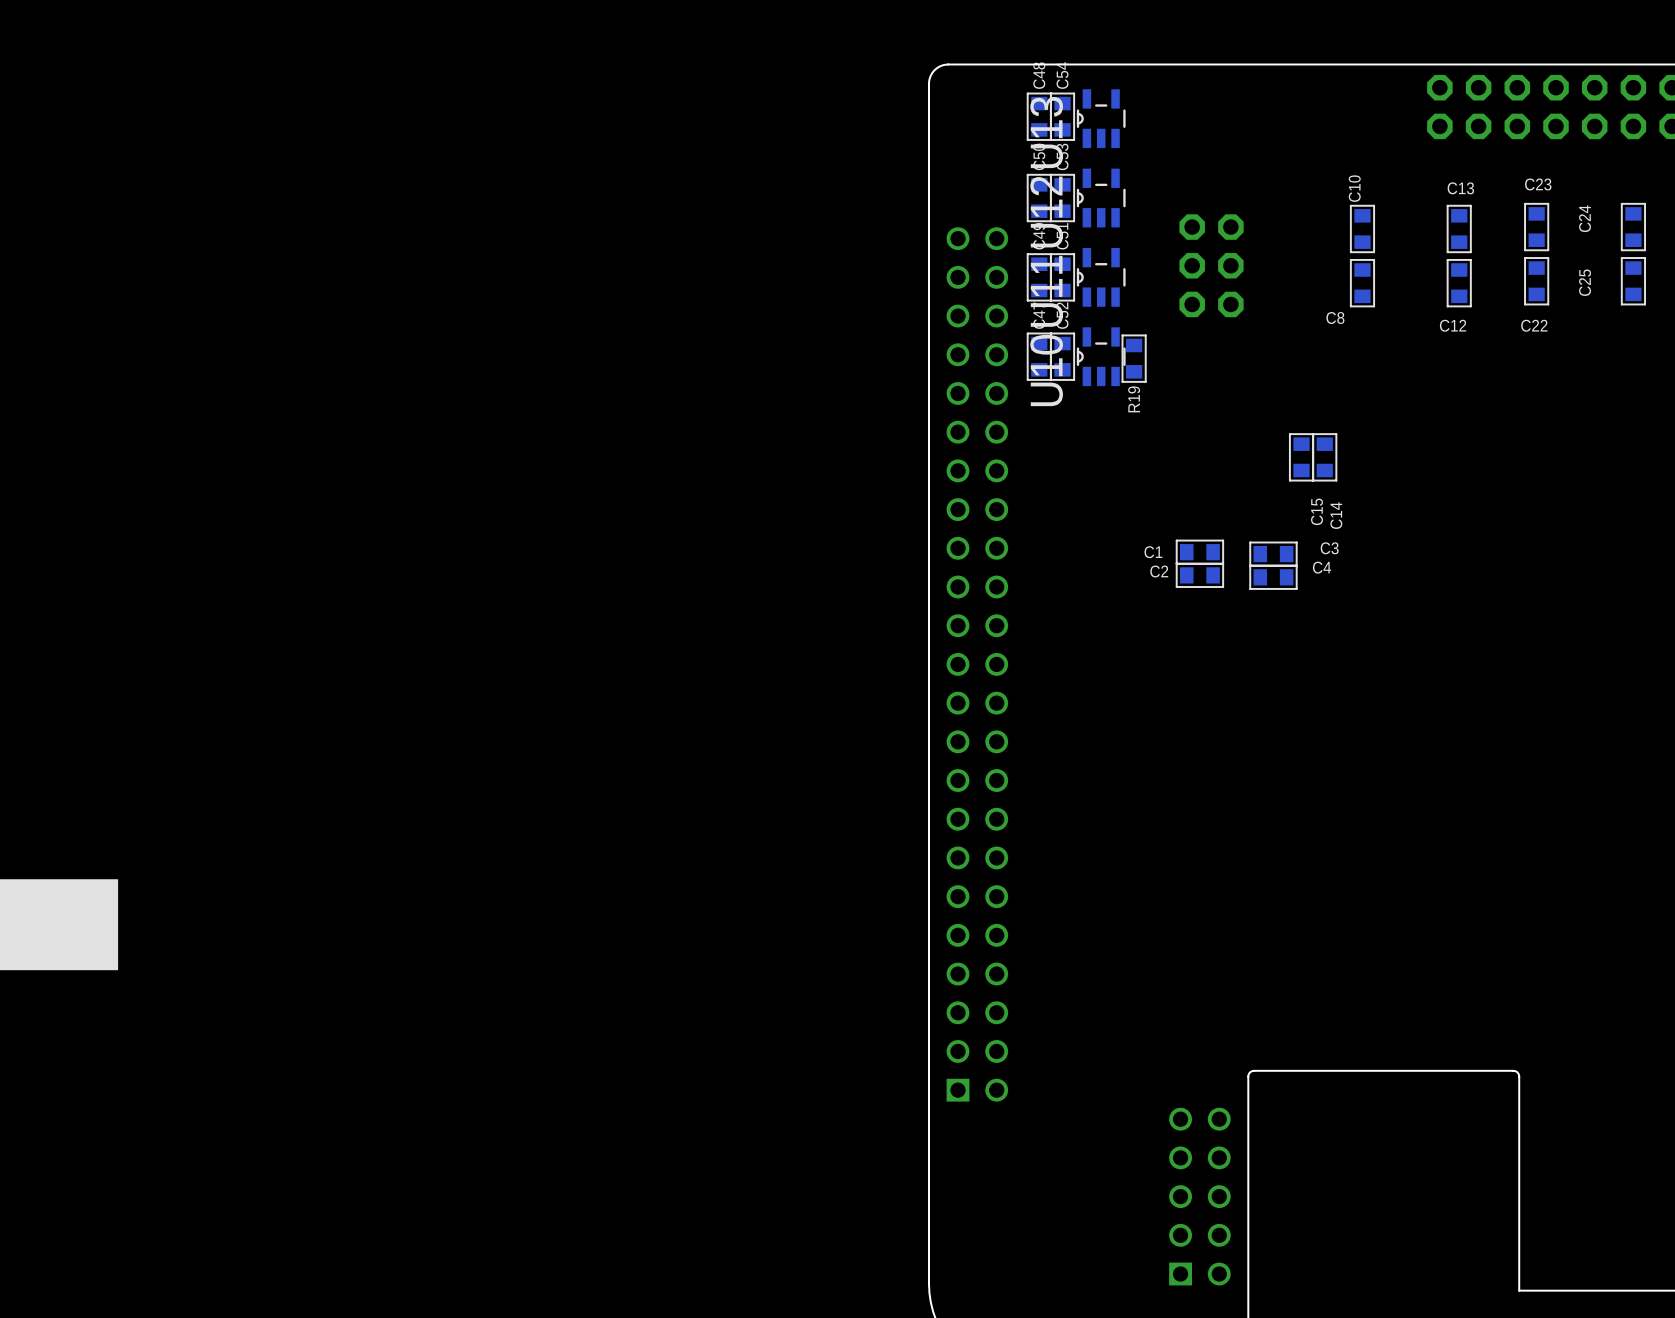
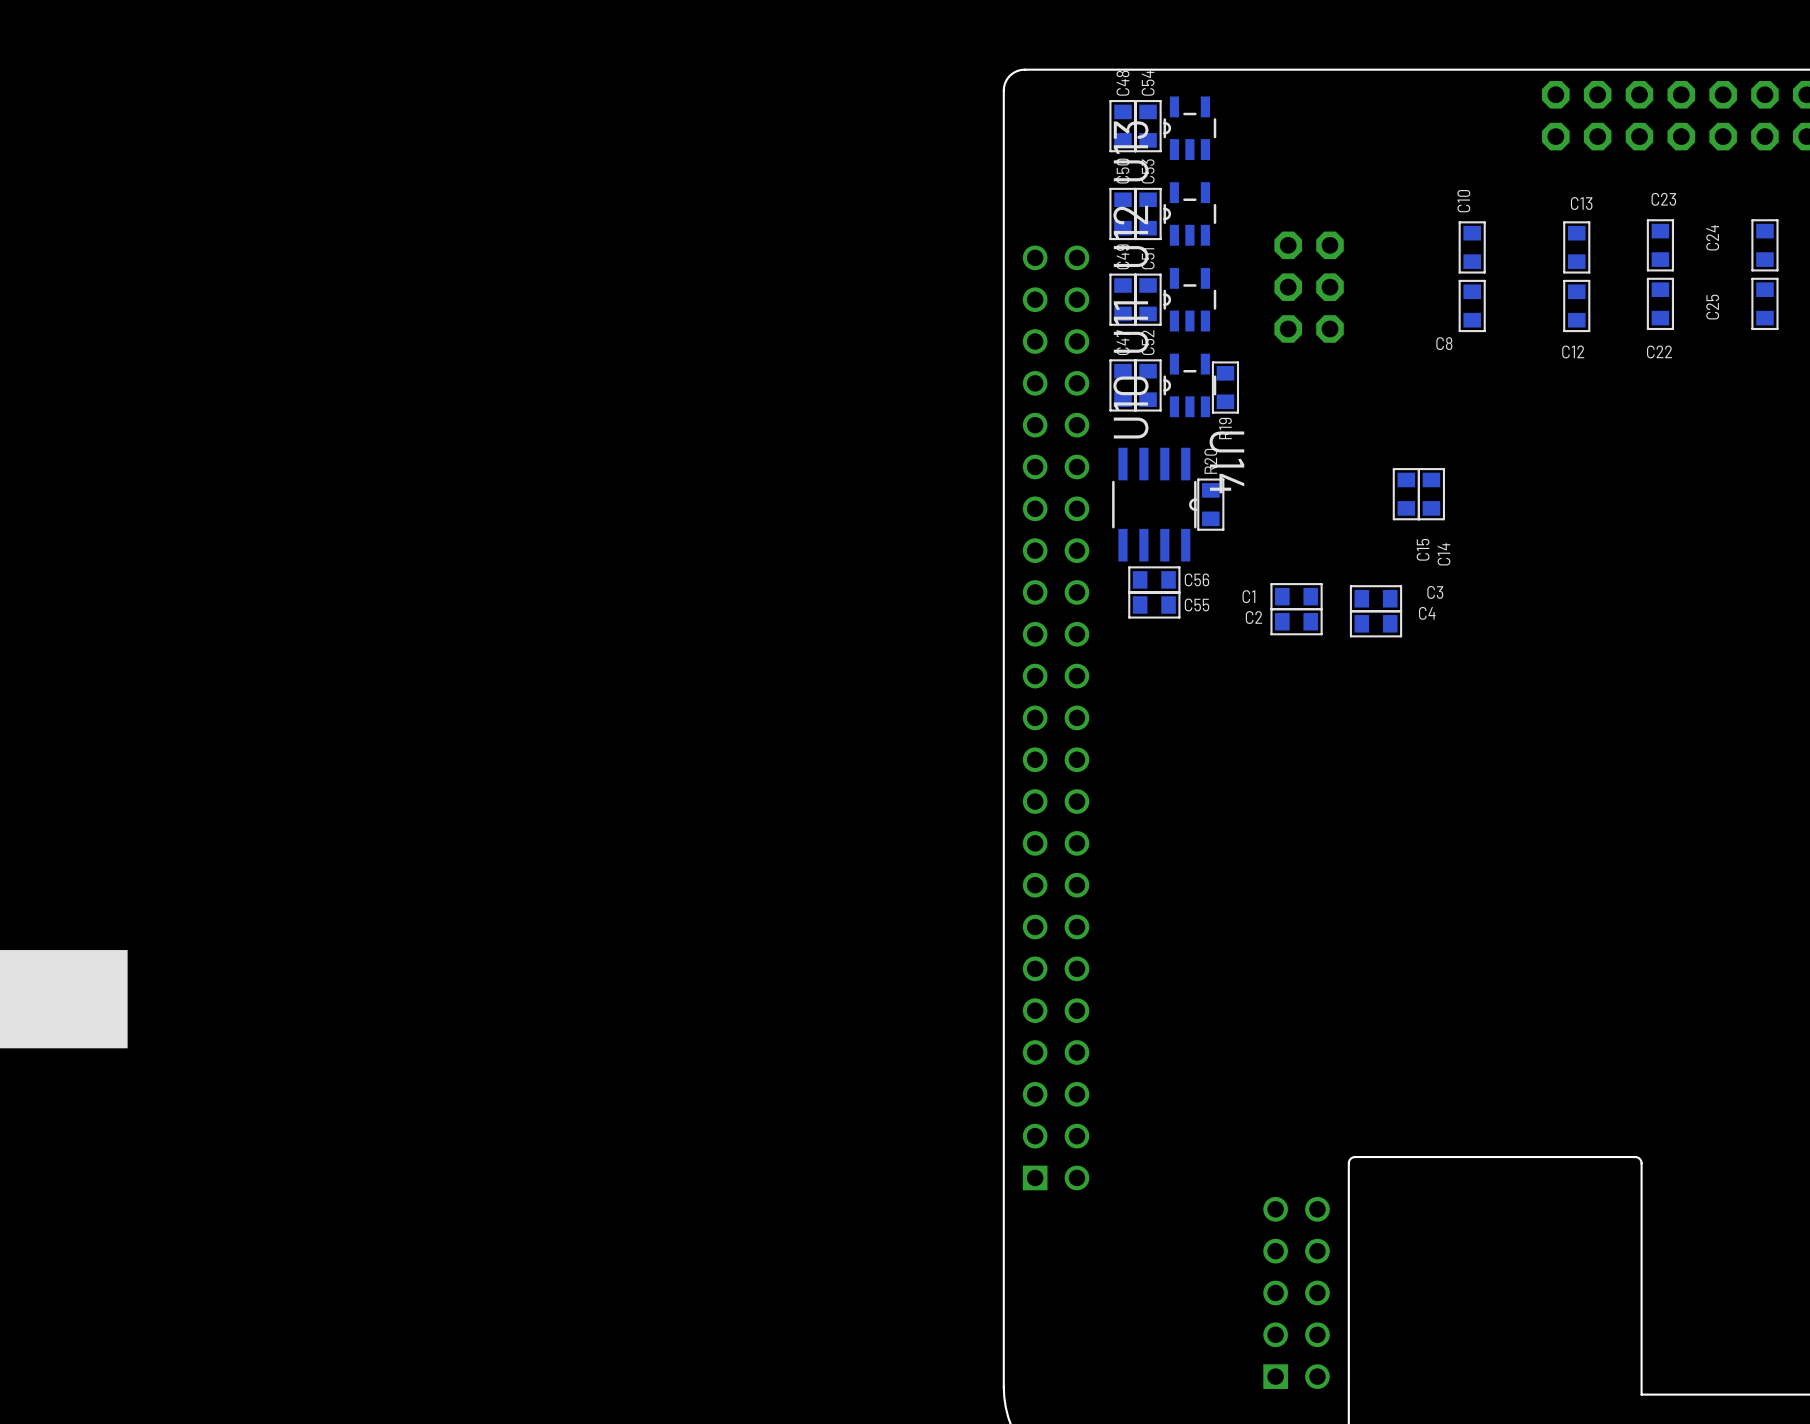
U14: none -> (1154, 504)
R20: none -> (1210, 504)
C56: none -> (1154, 579)
C55: none -> (1154, 605)

